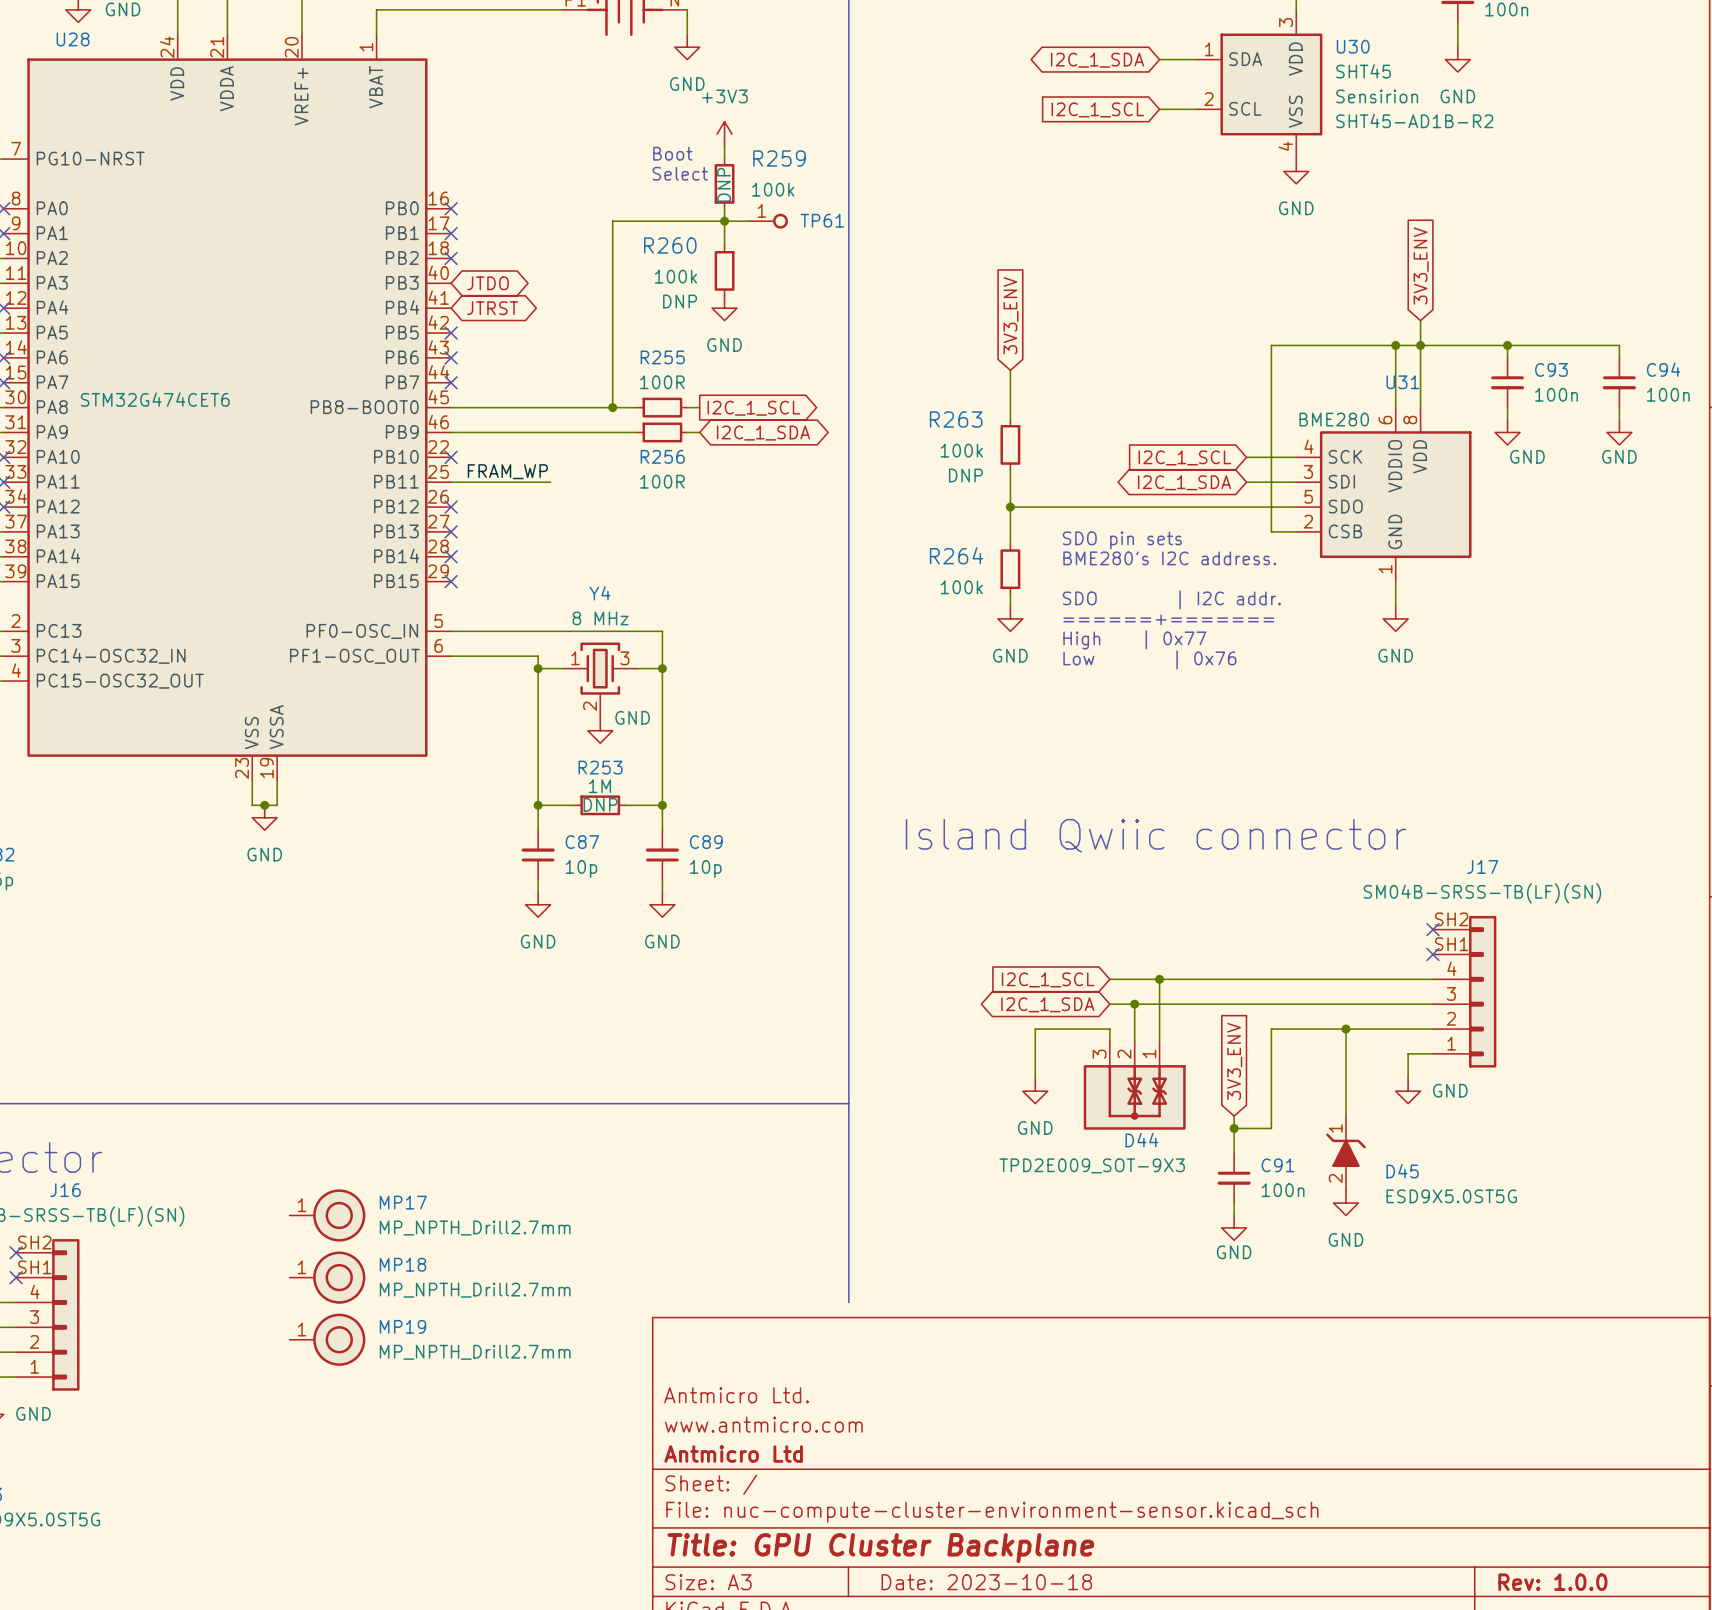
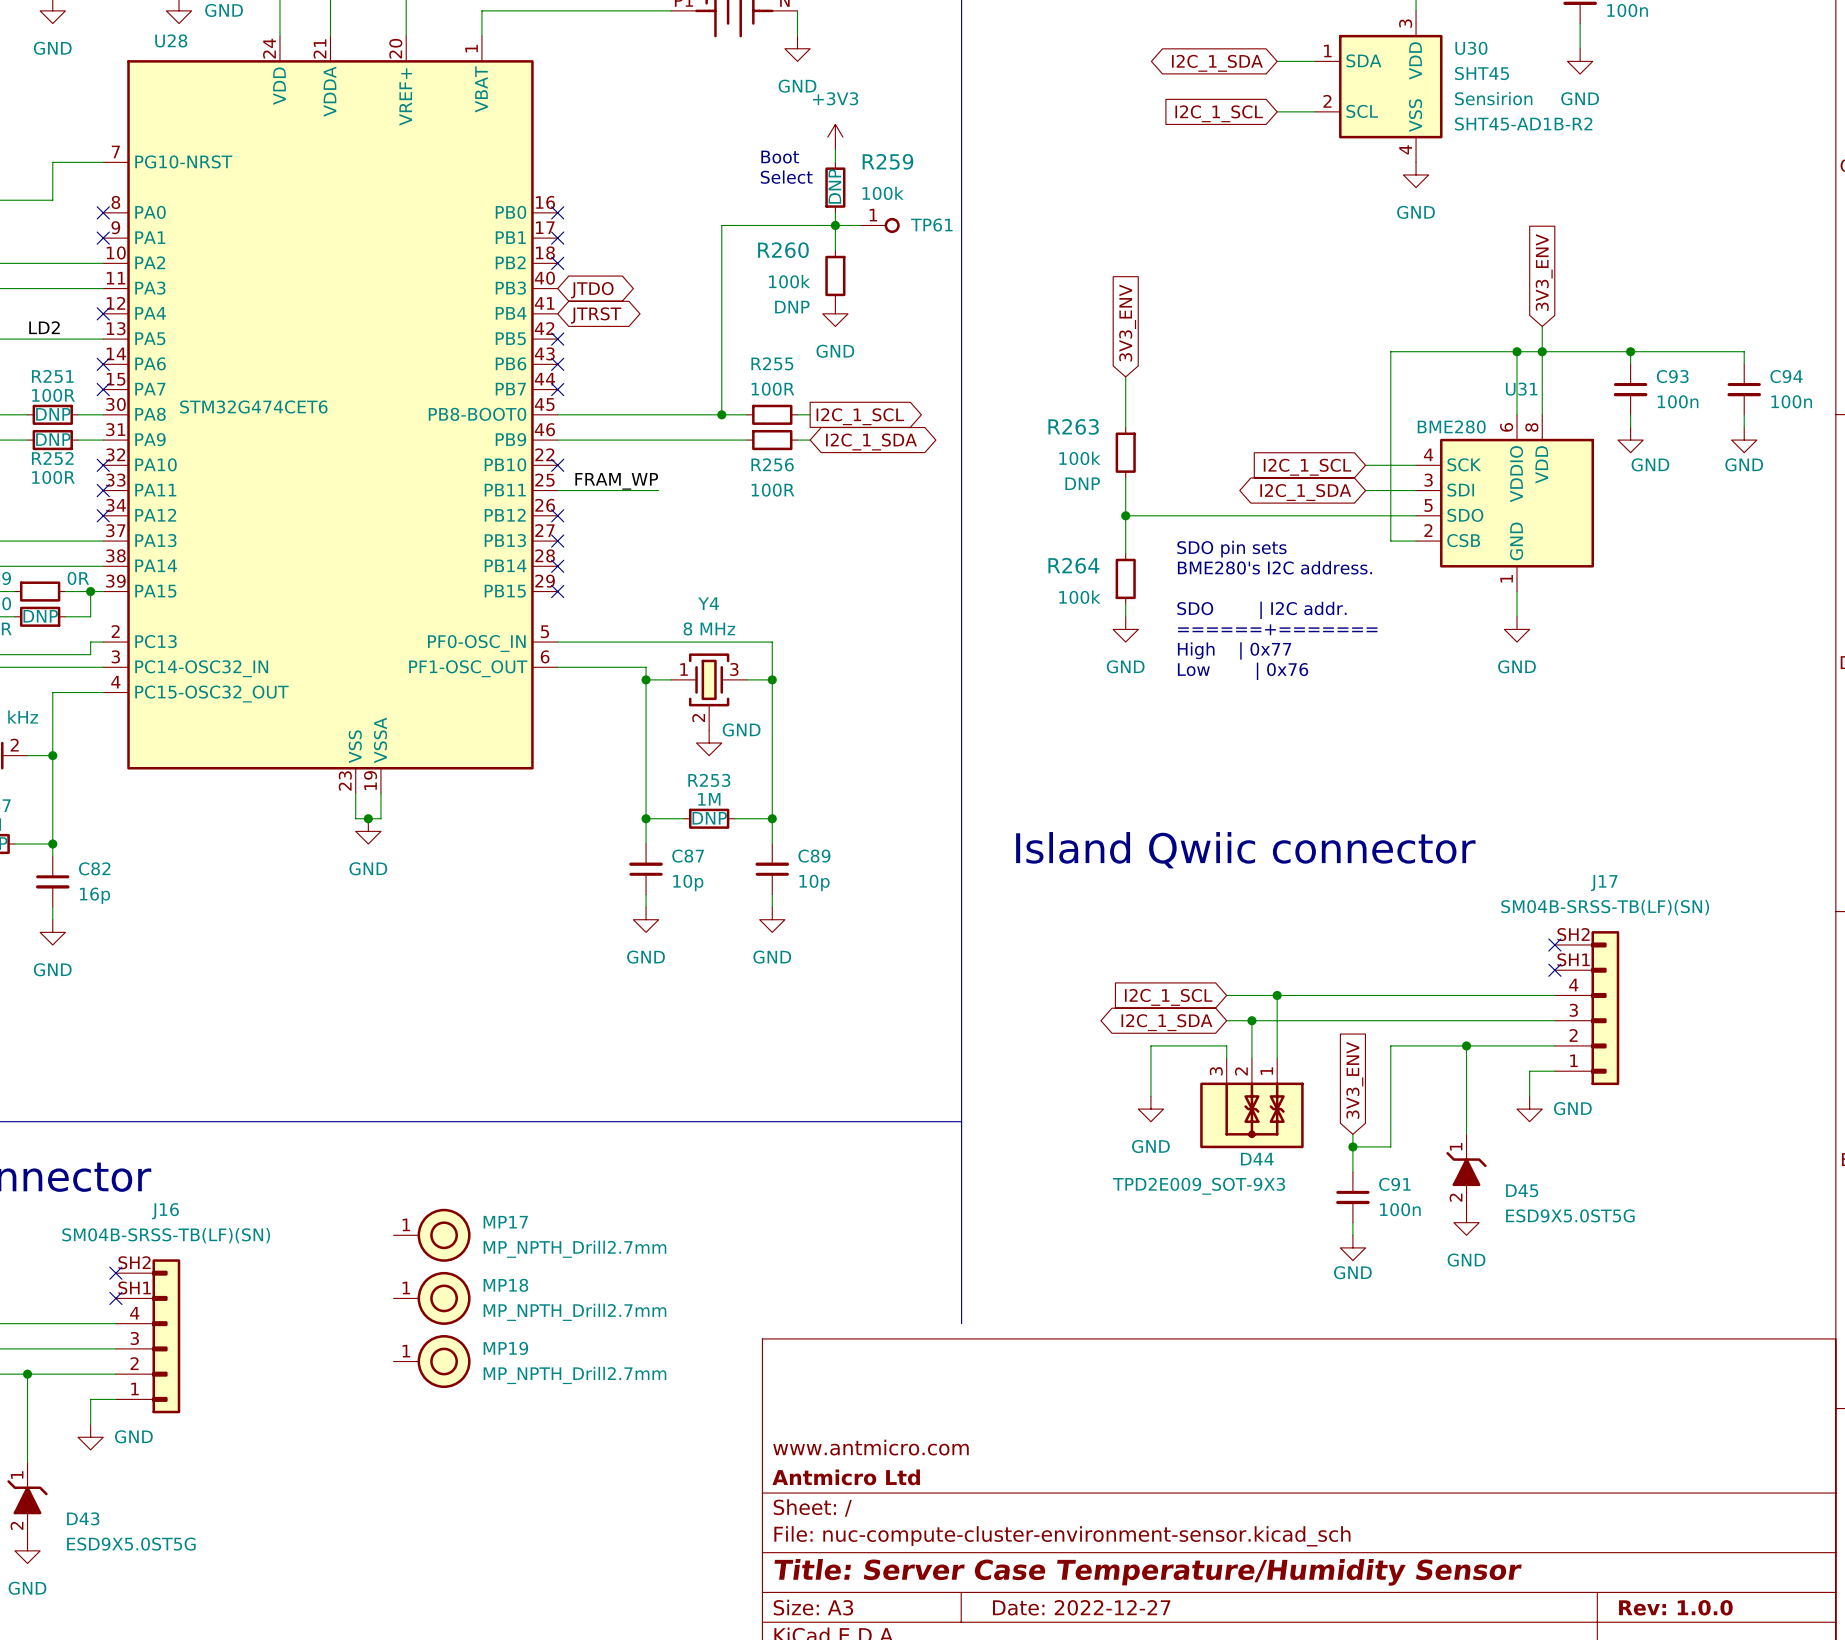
title block: Antmicro Ltd. (736, 1395) -> none
title block: Title: GPU Cluster Backplane (880, 1548) -> Title: Server Case Temperature/Humidity Sensor (1148, 1572)
title block: Date: 2023-10-18 (986, 1582) -> Date: 2022-12-27 (1081, 1607)

